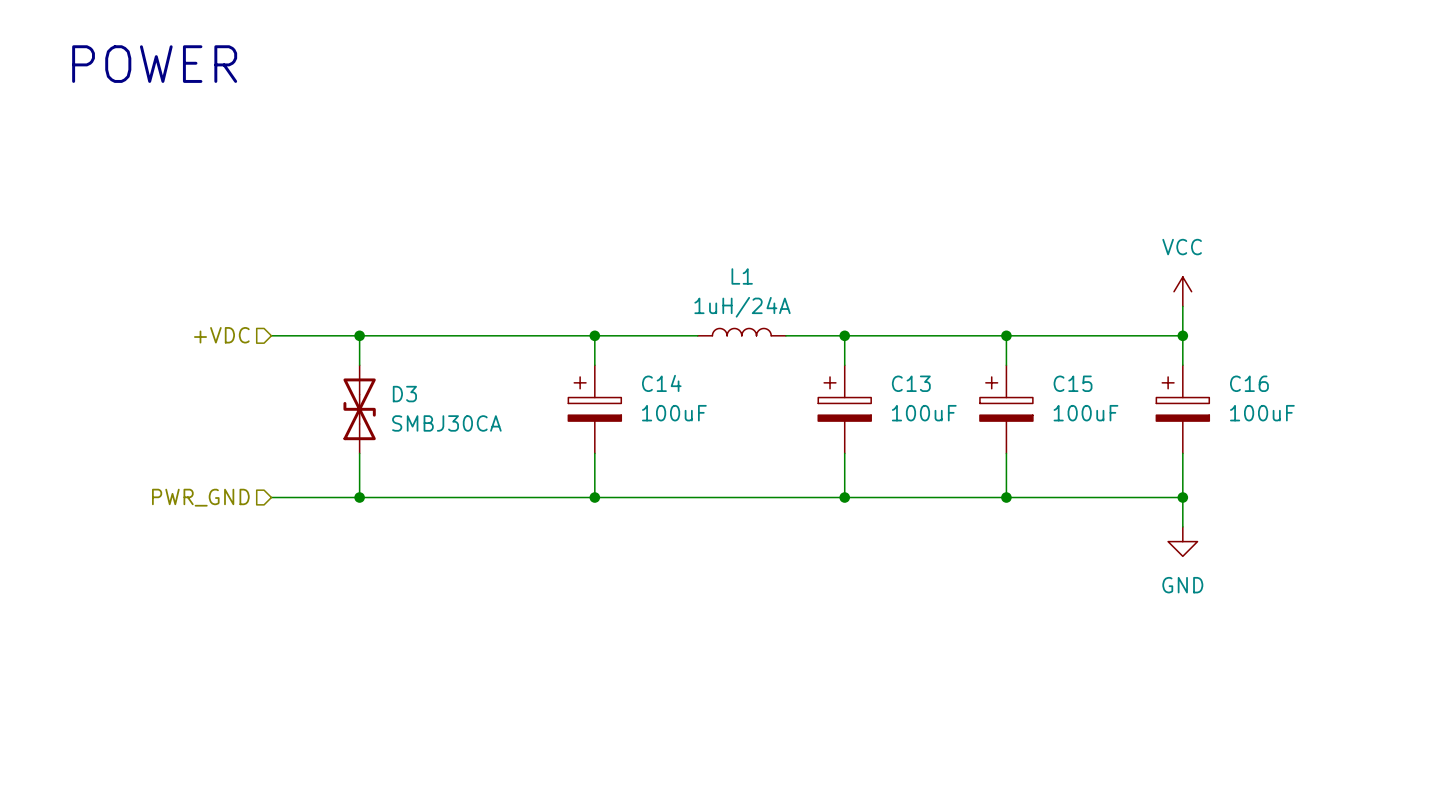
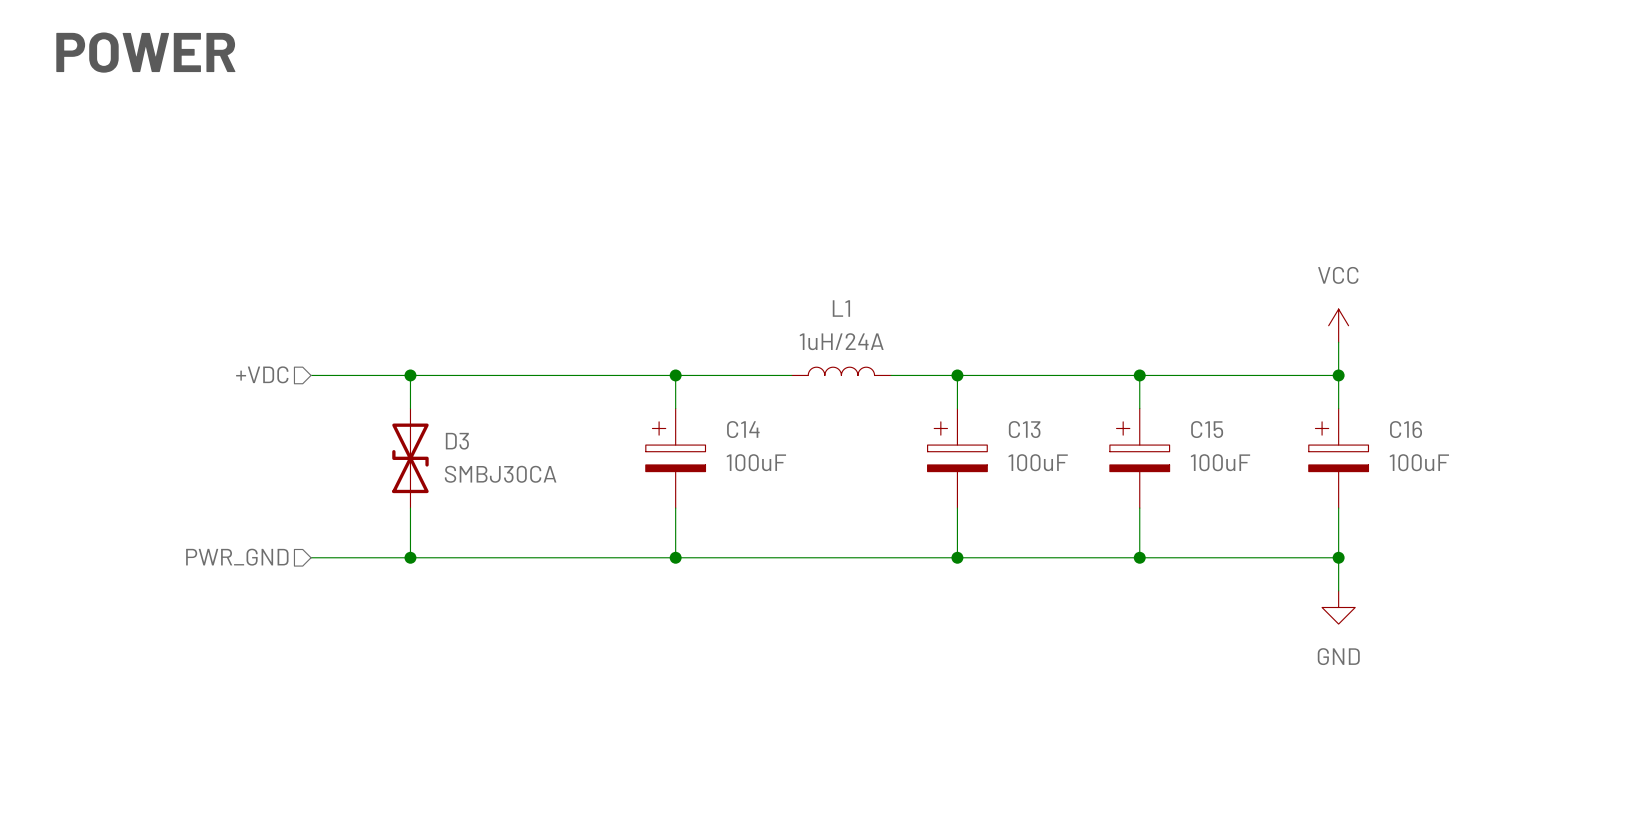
text position: POWER (154, 64) -> POWER (145, 52)

